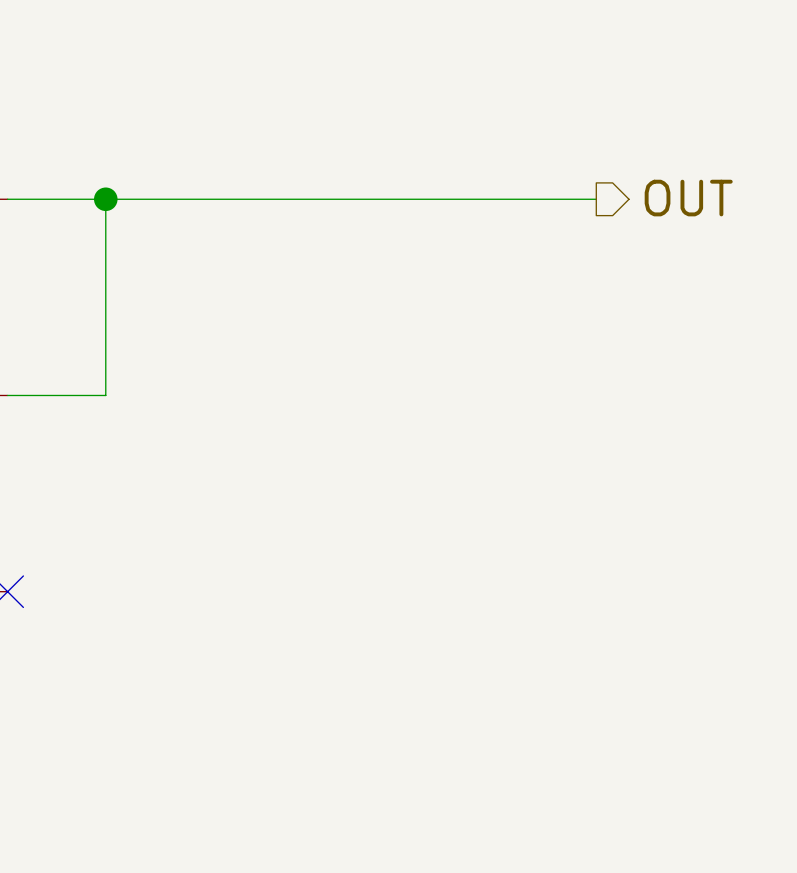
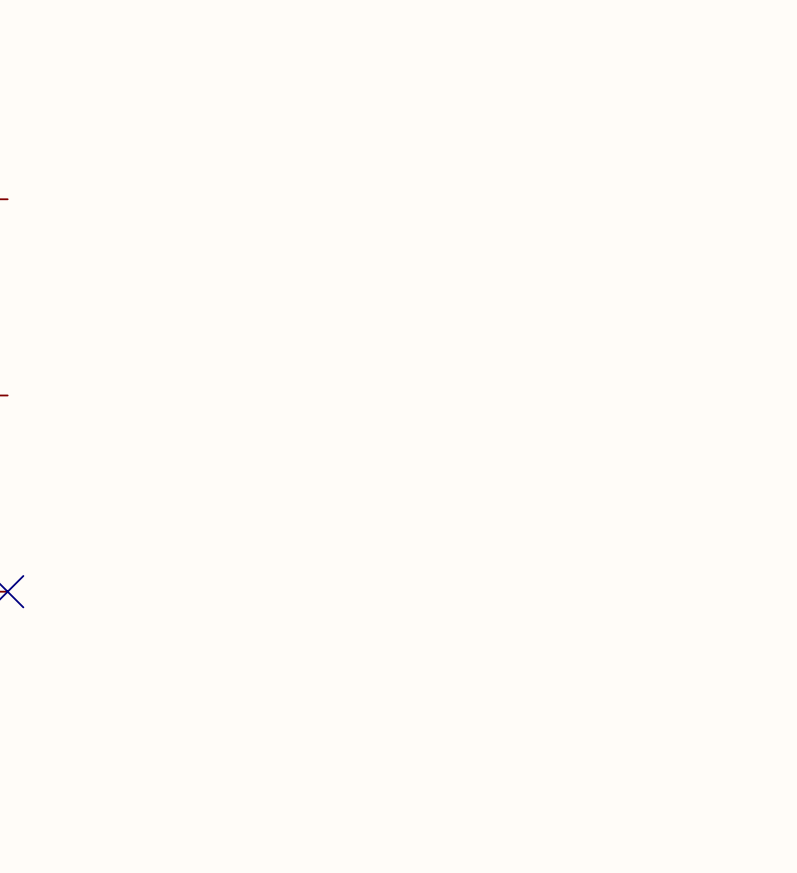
hierarchical label: OUT (688, 198) -> none
wire: (7, 199) (596, 199) -> none
wire: (105, 199) (105, 395) (7, 395) -> none
junction: (105, 199) -> none

